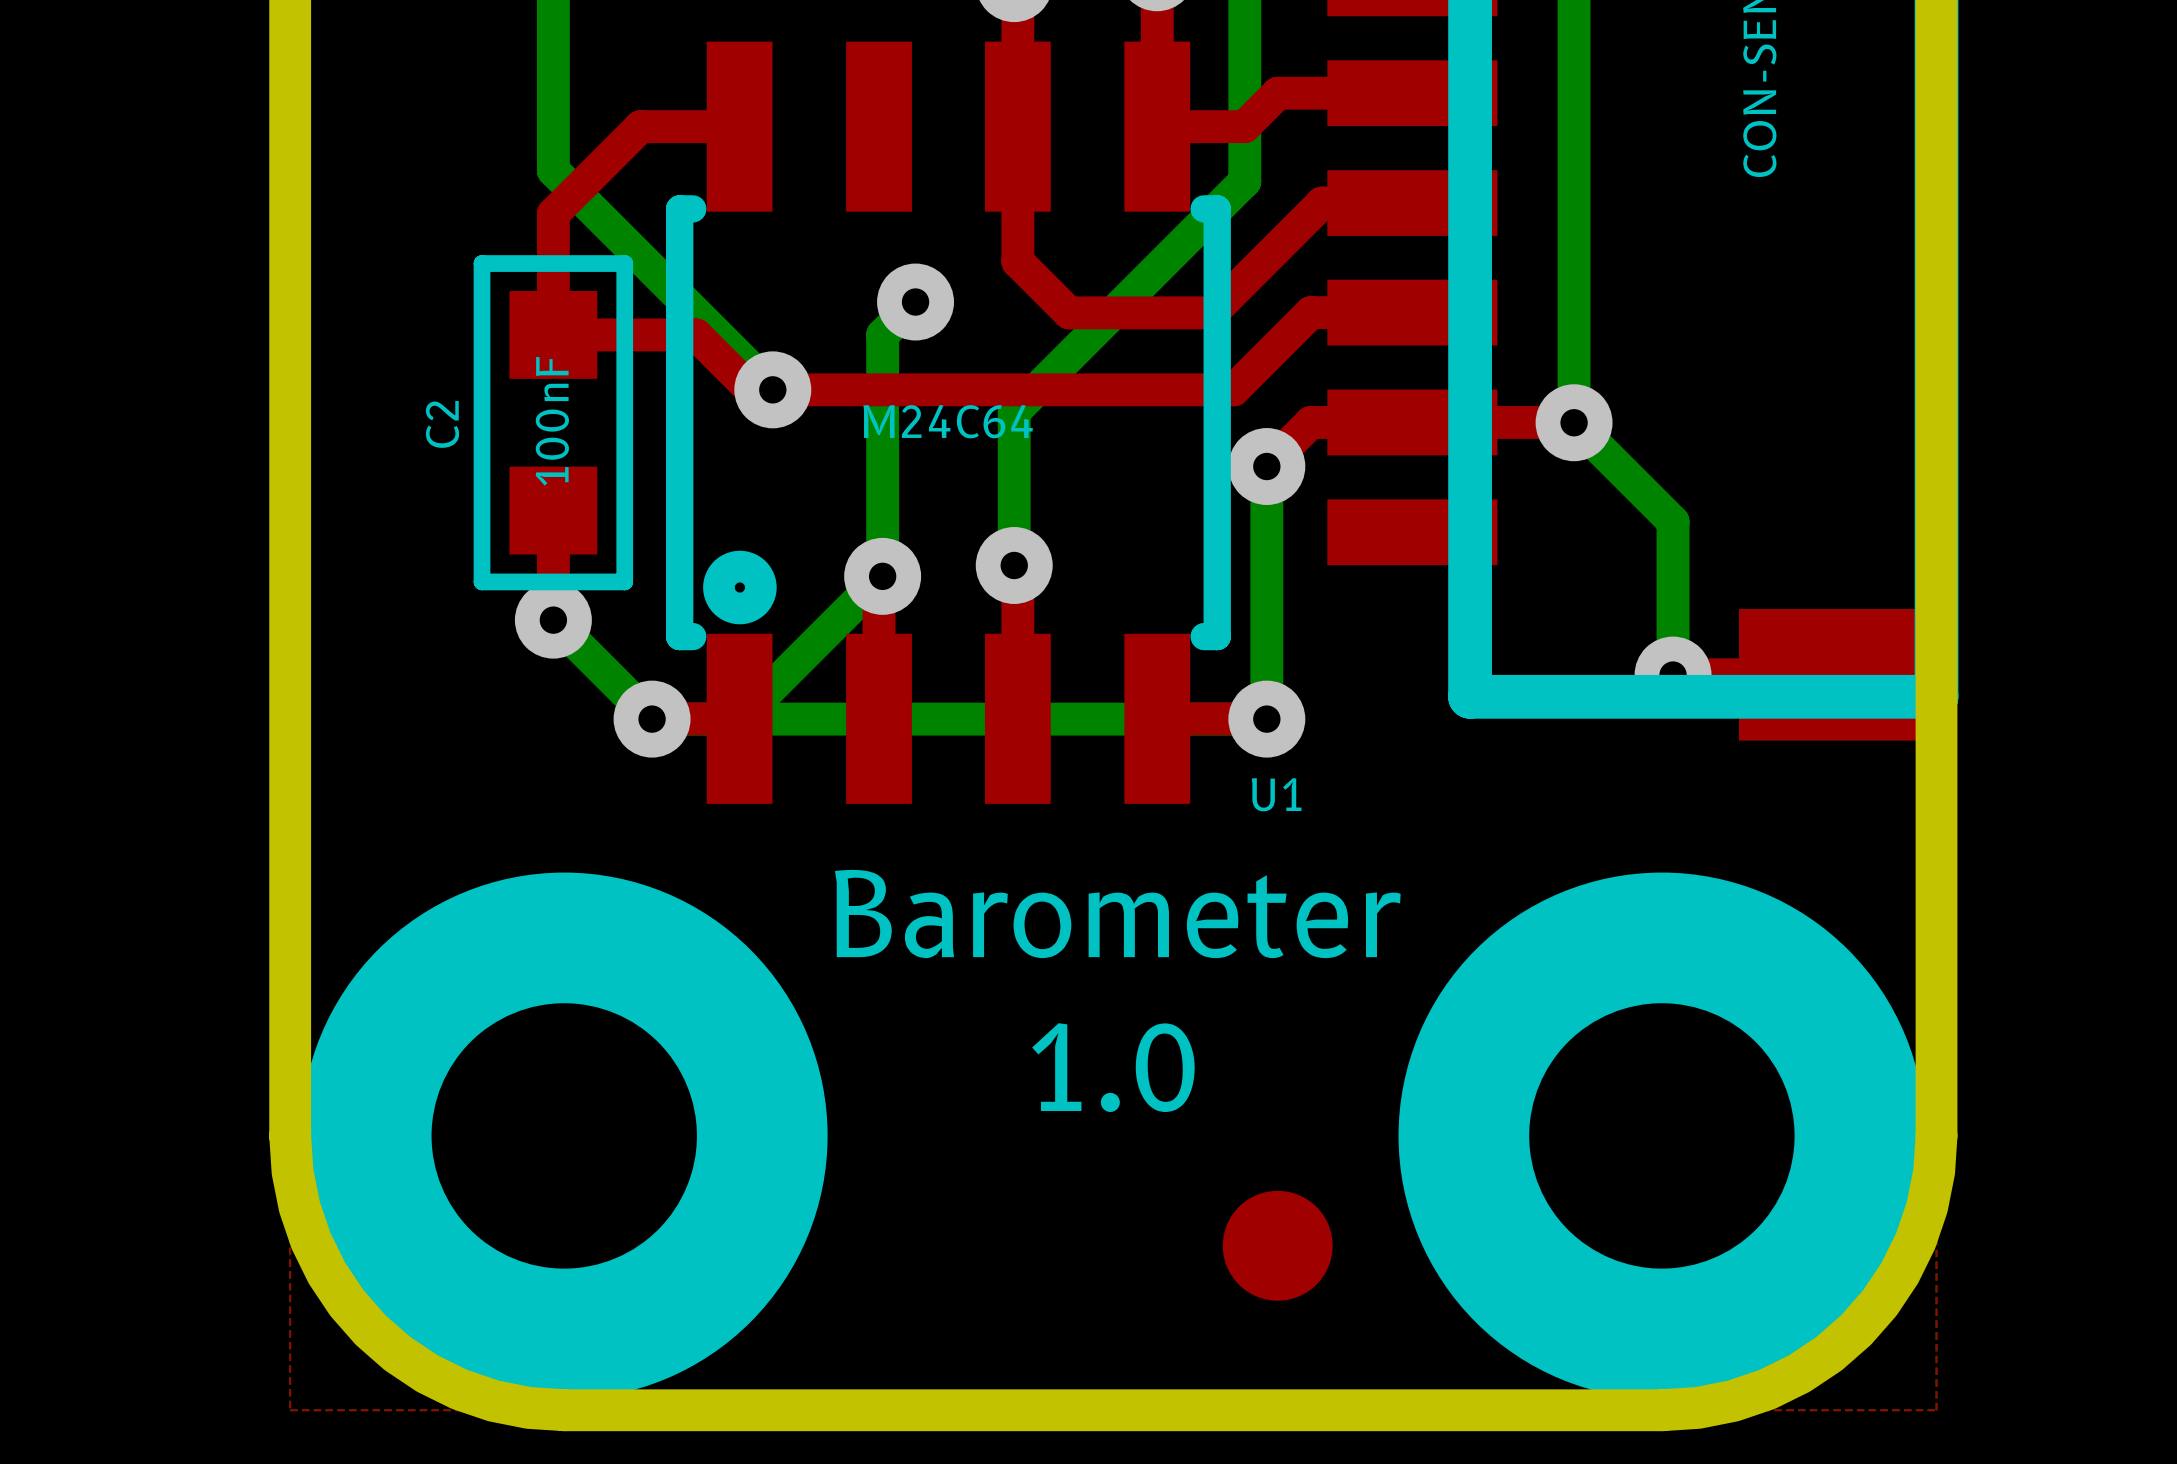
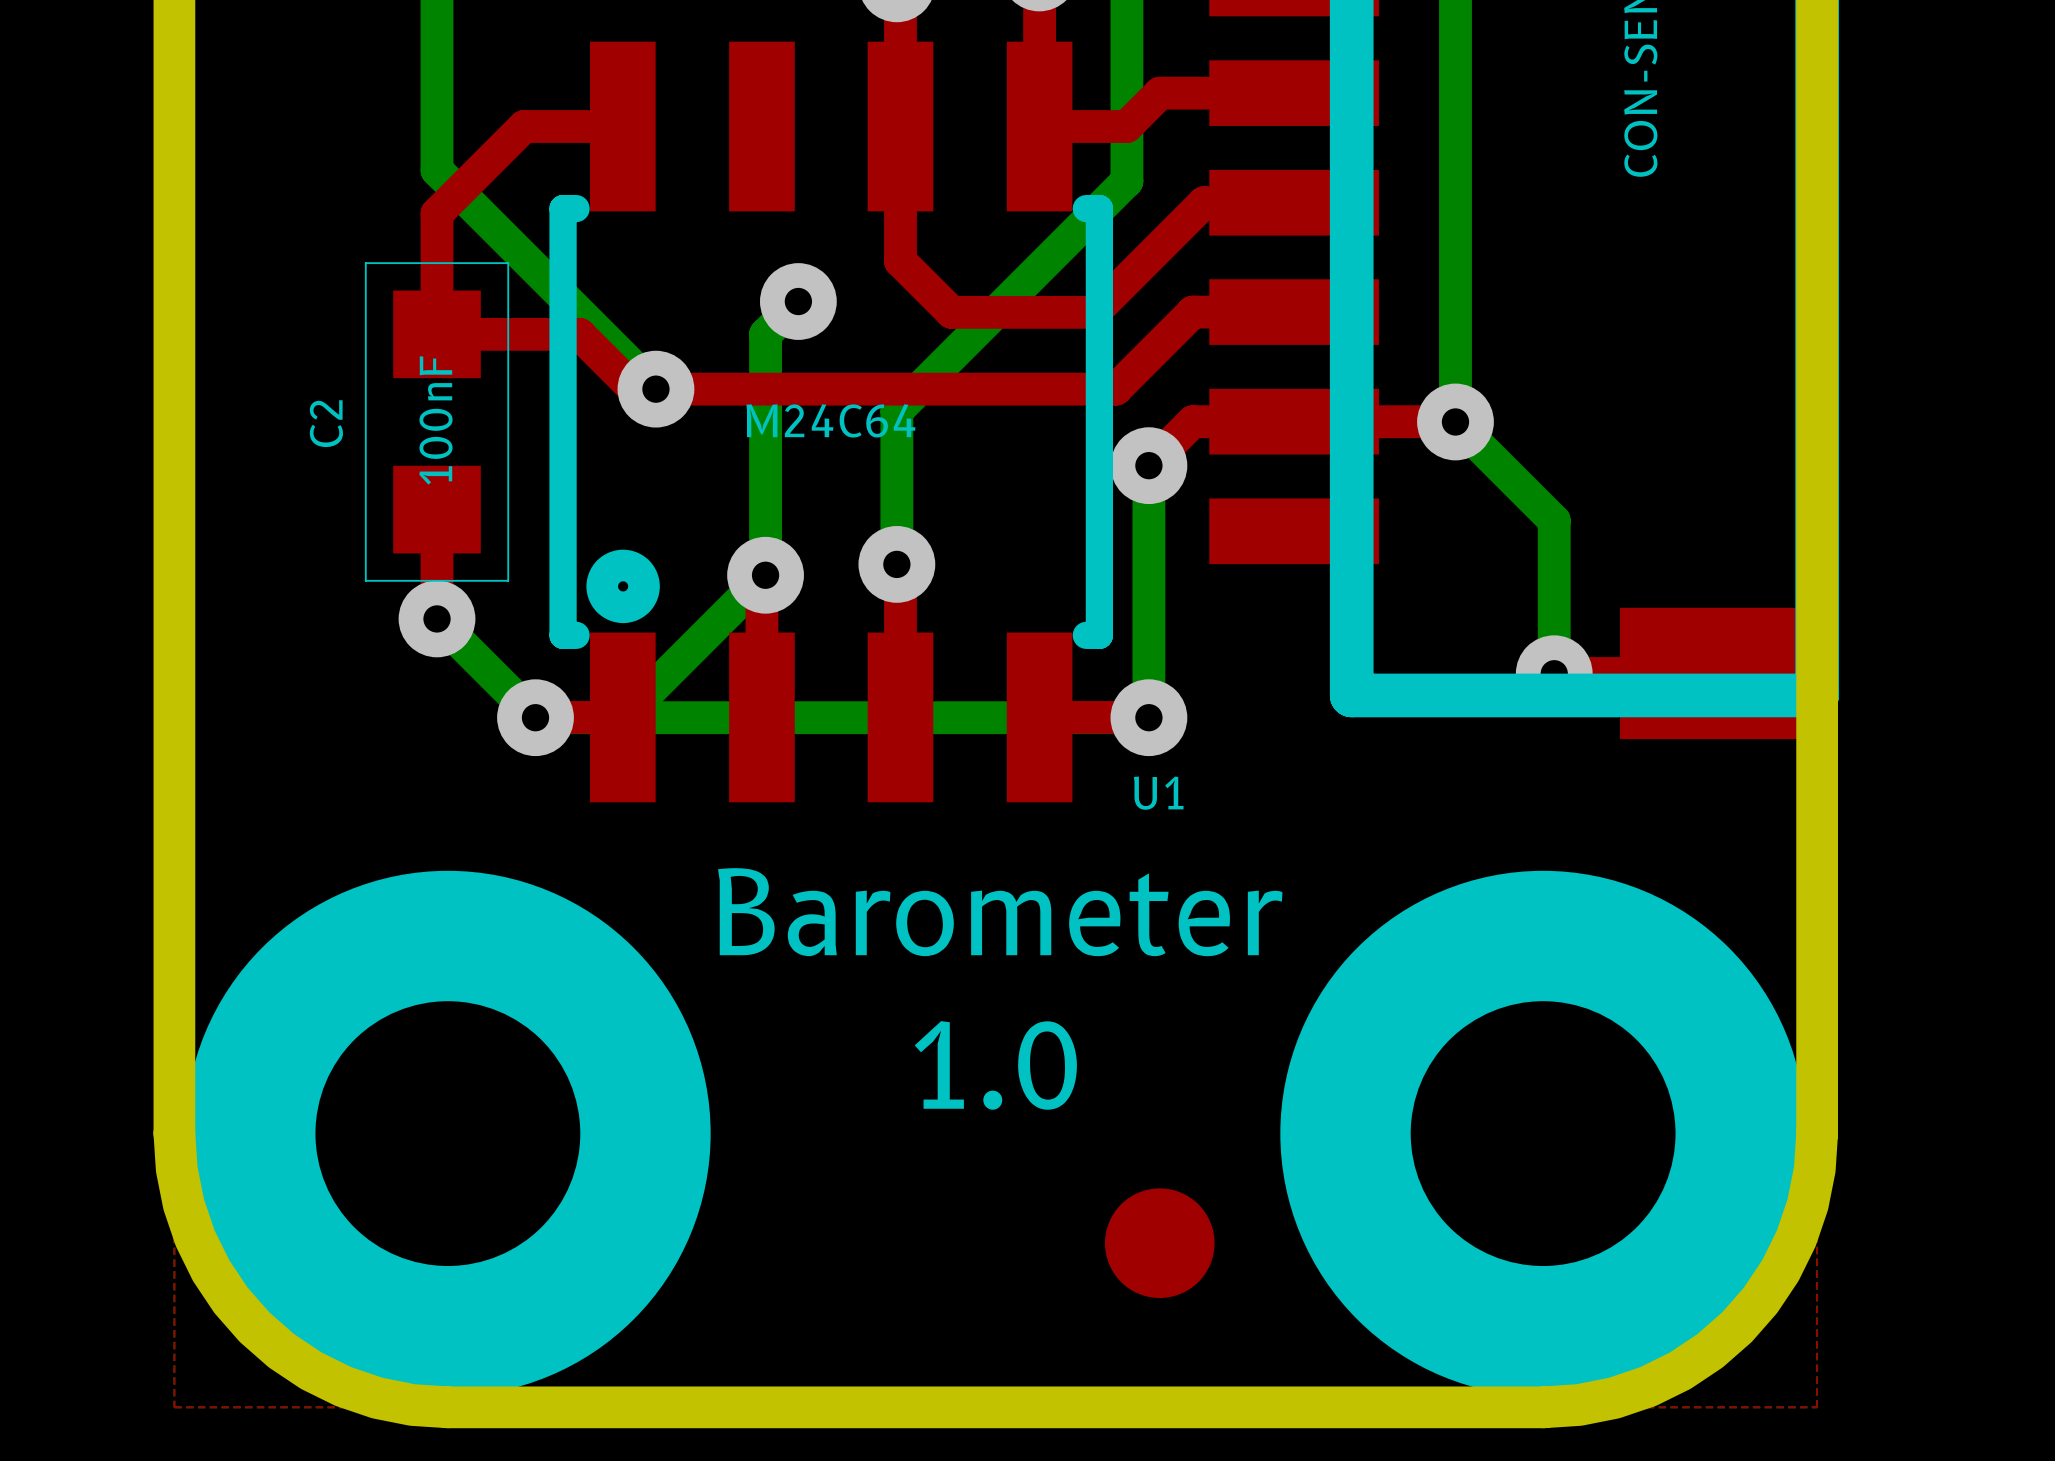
C2 footprint: [473, 255, 634, 591] -> [365, 262, 509, 582]

